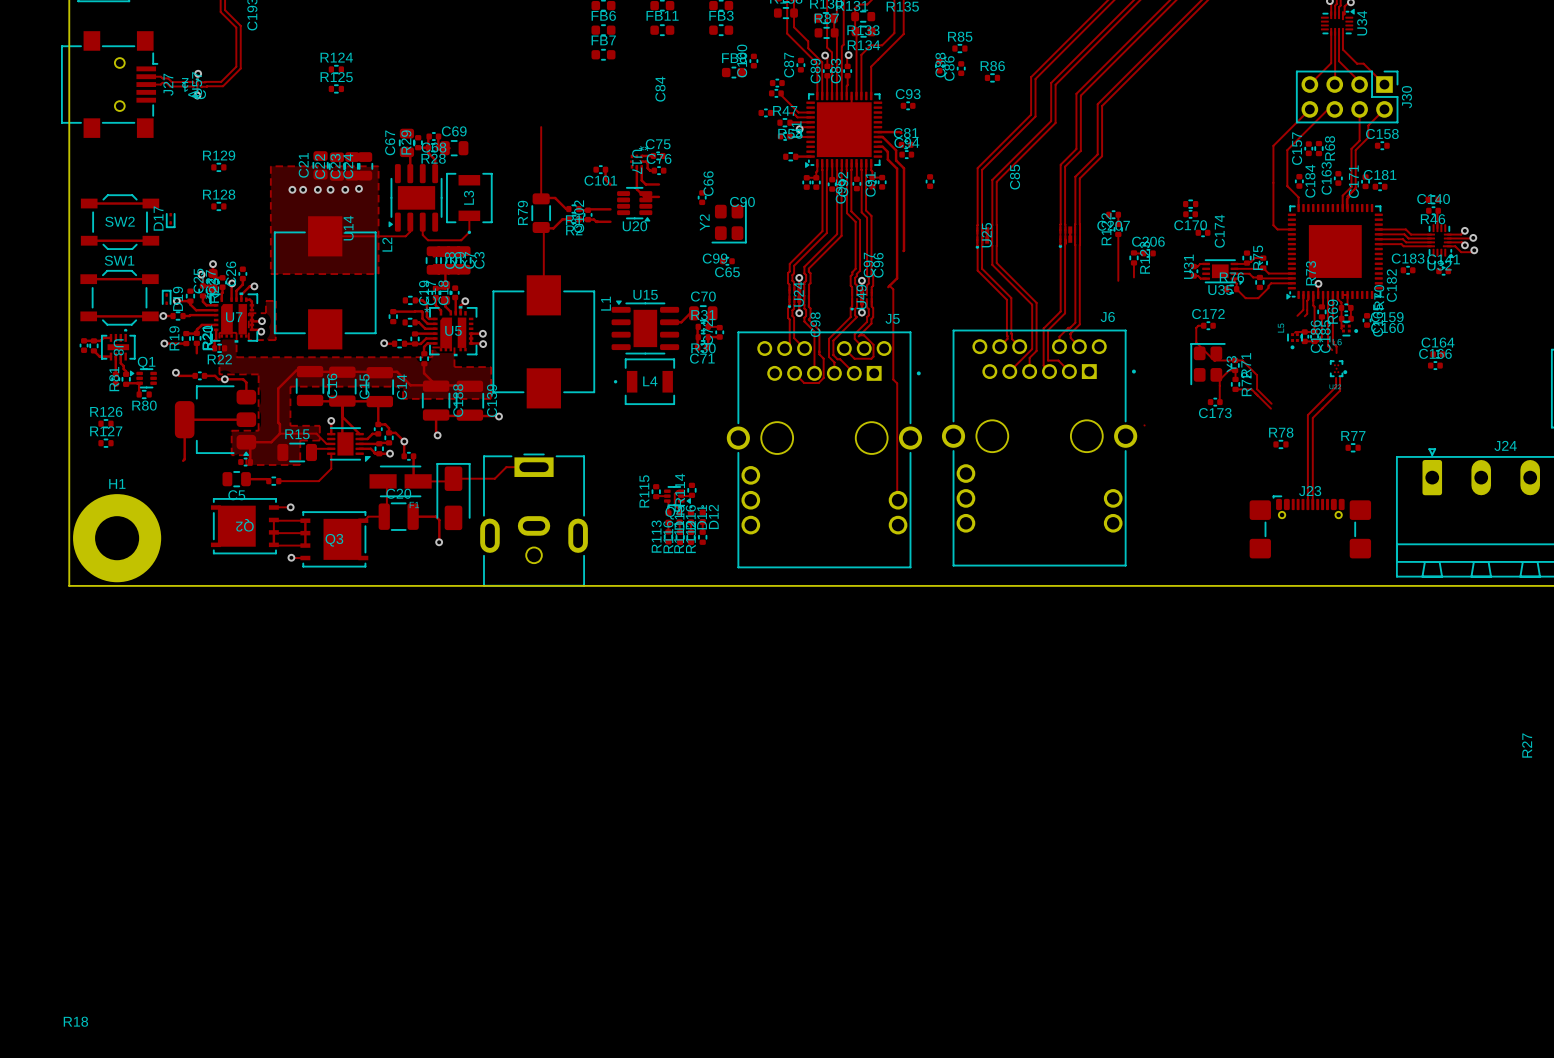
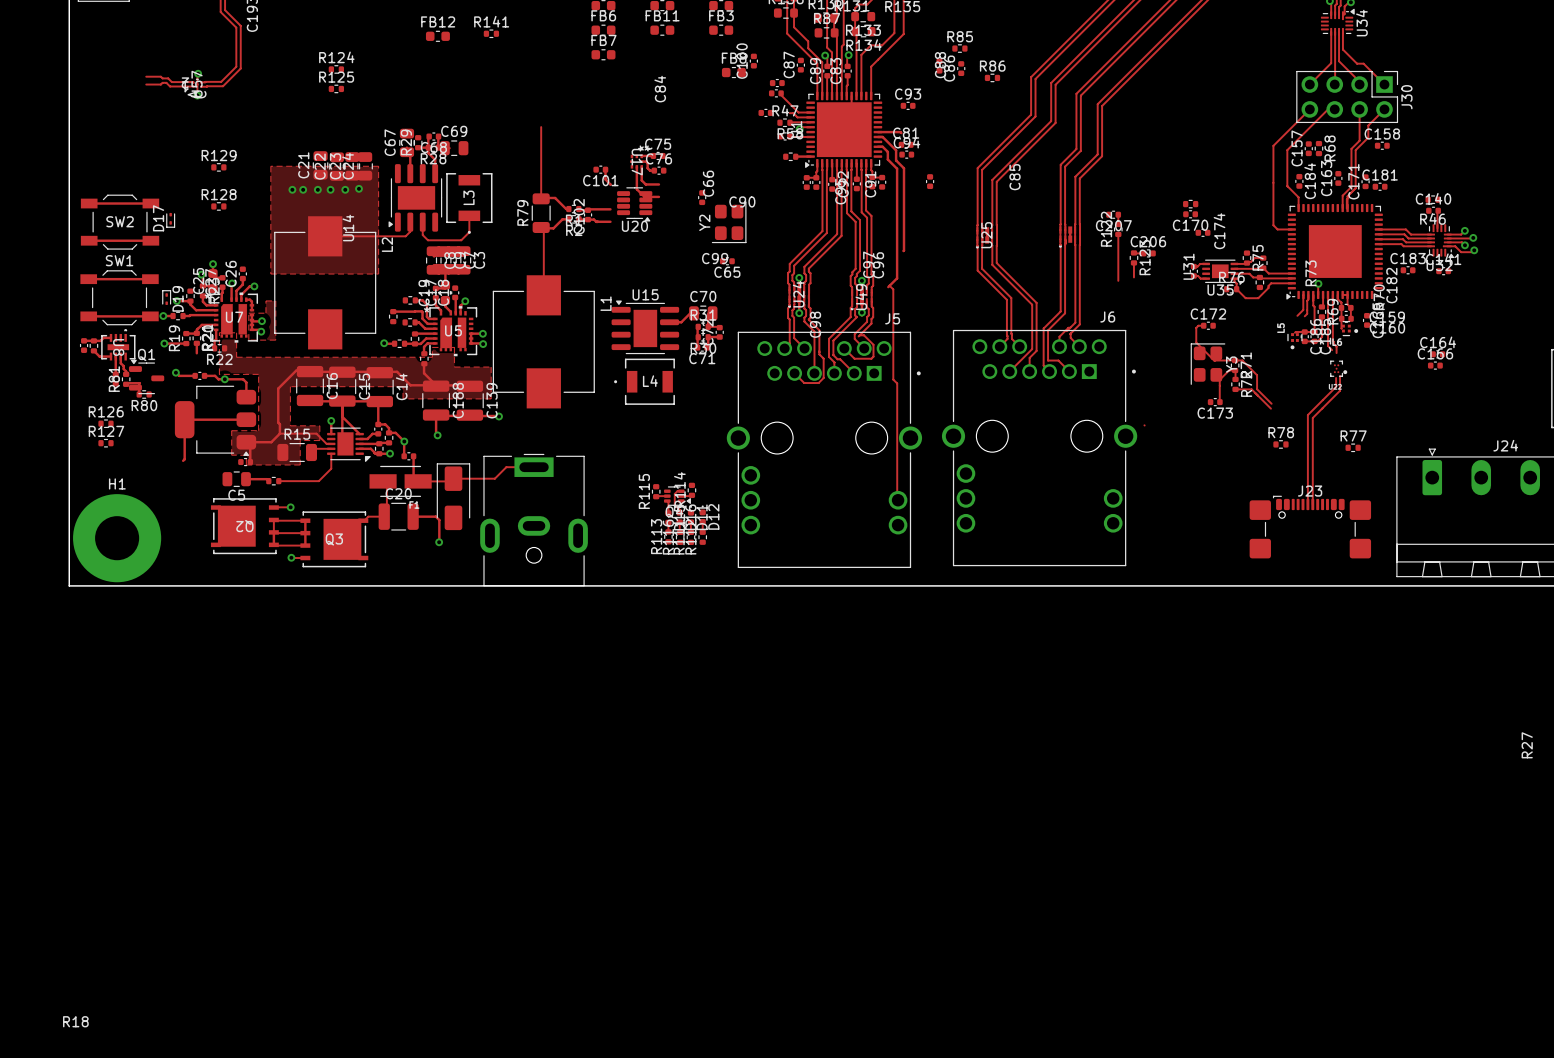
R141: none -> (491, 33)
FB12: none -> (437, 36)
J27: (109, 84) -> none
Q1 footprint: [129, 368, 157, 389] -> [128, 359, 165, 395]

